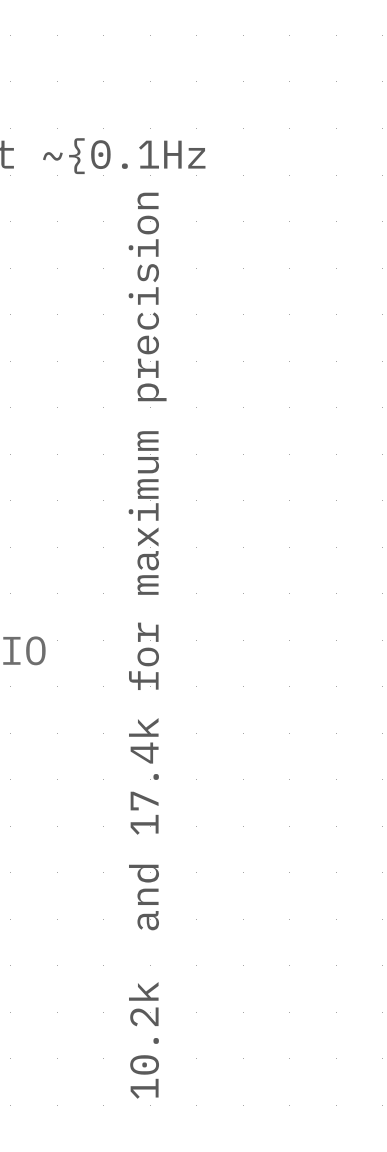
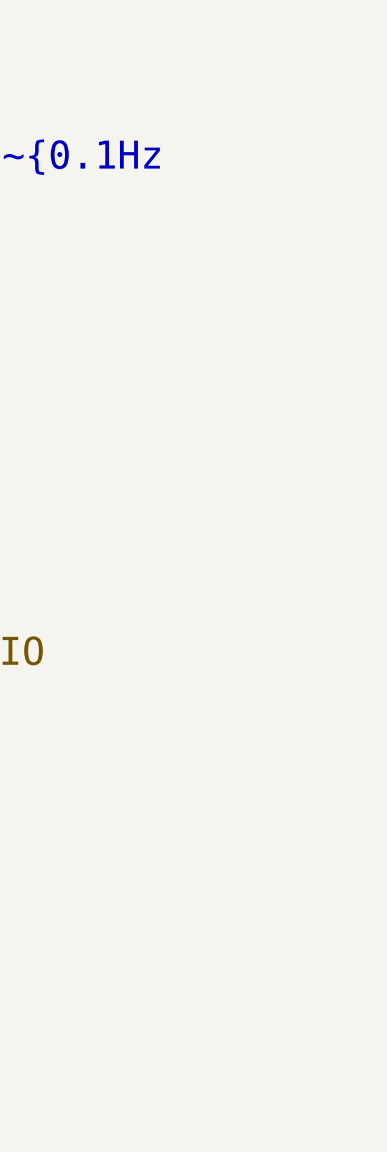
text: 10.2k and 17.4k for maximum precision (147, 645) -> none

